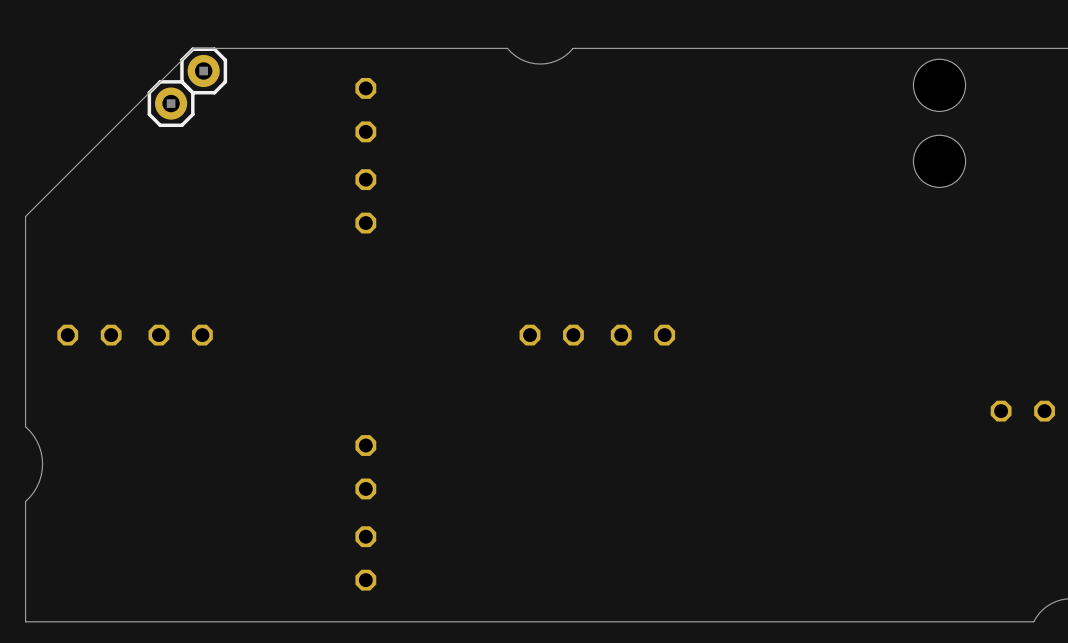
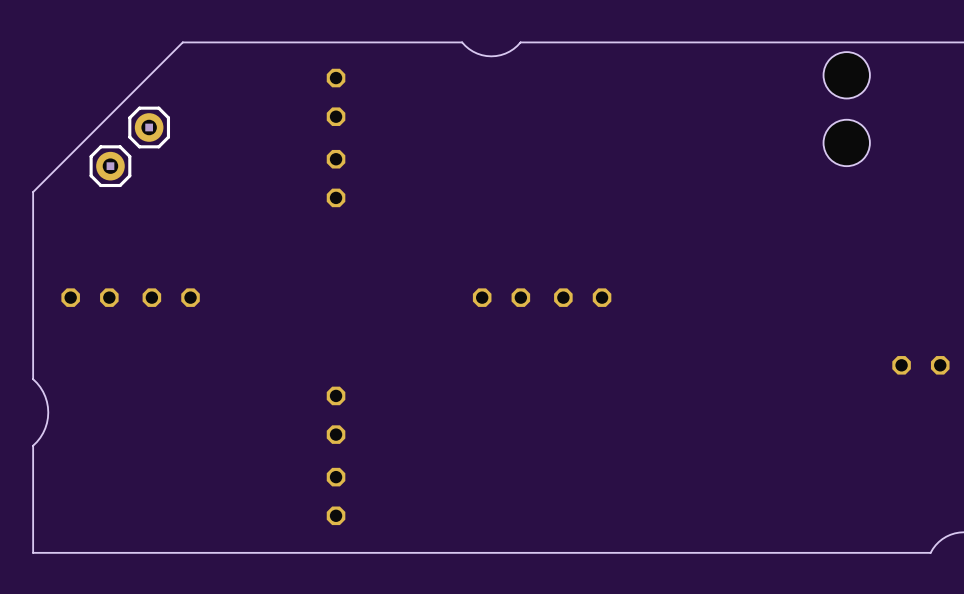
part: (203, 70) -> none
part position: (171, 103) -> (149, 127)
part: none -> (110, 166)

